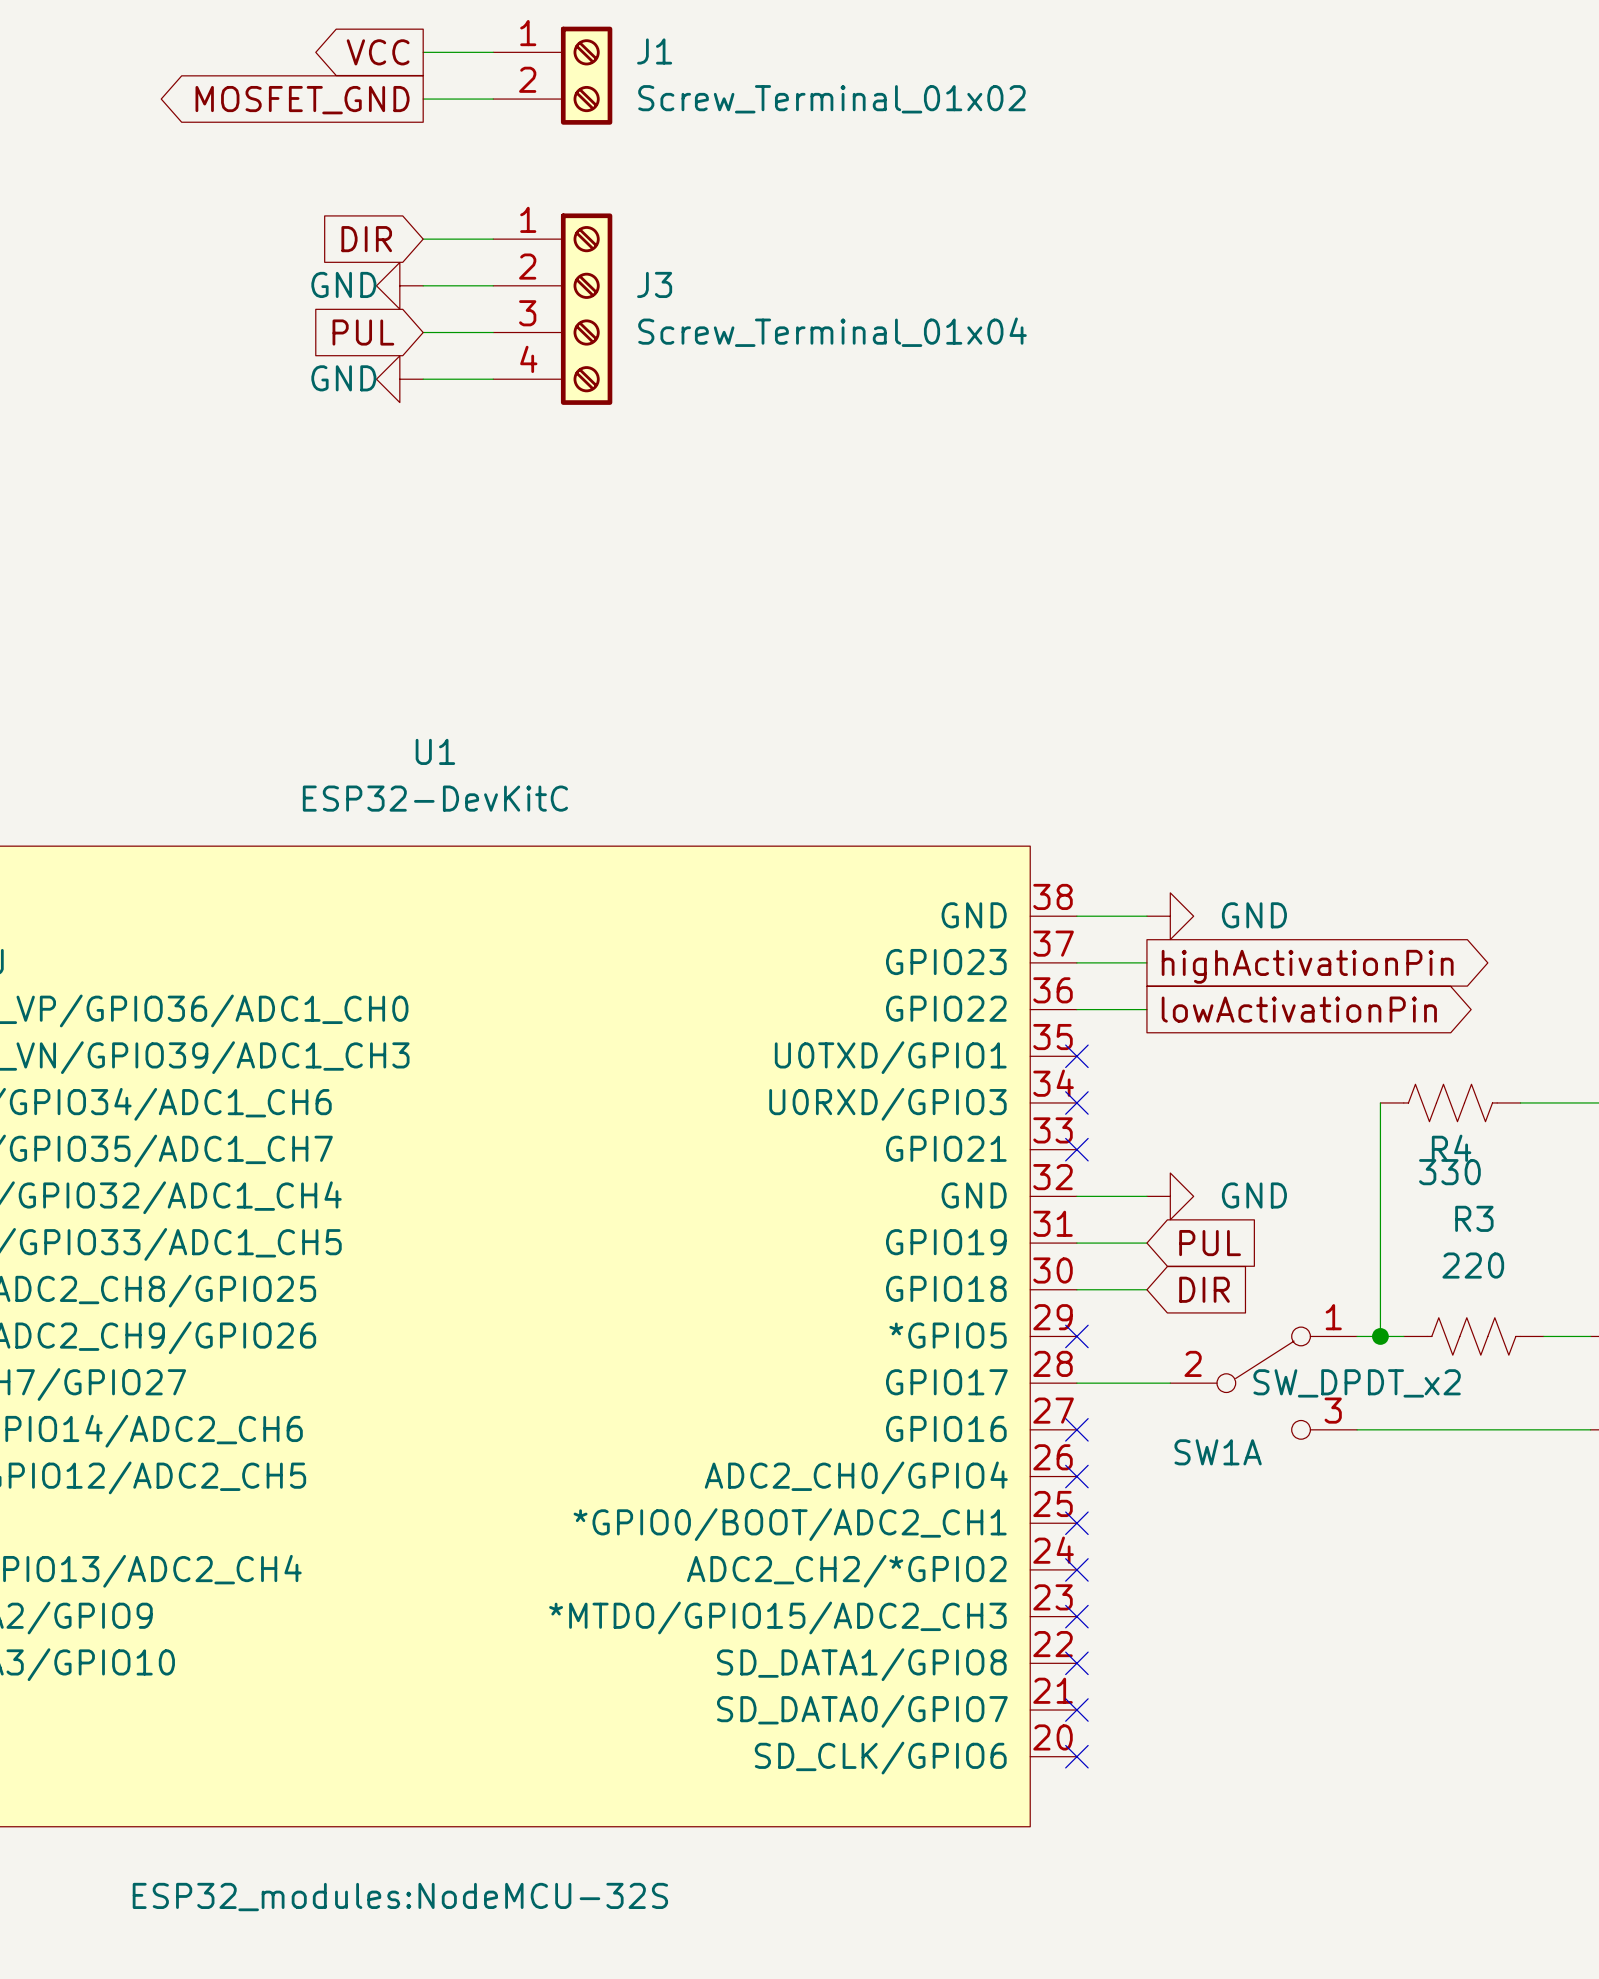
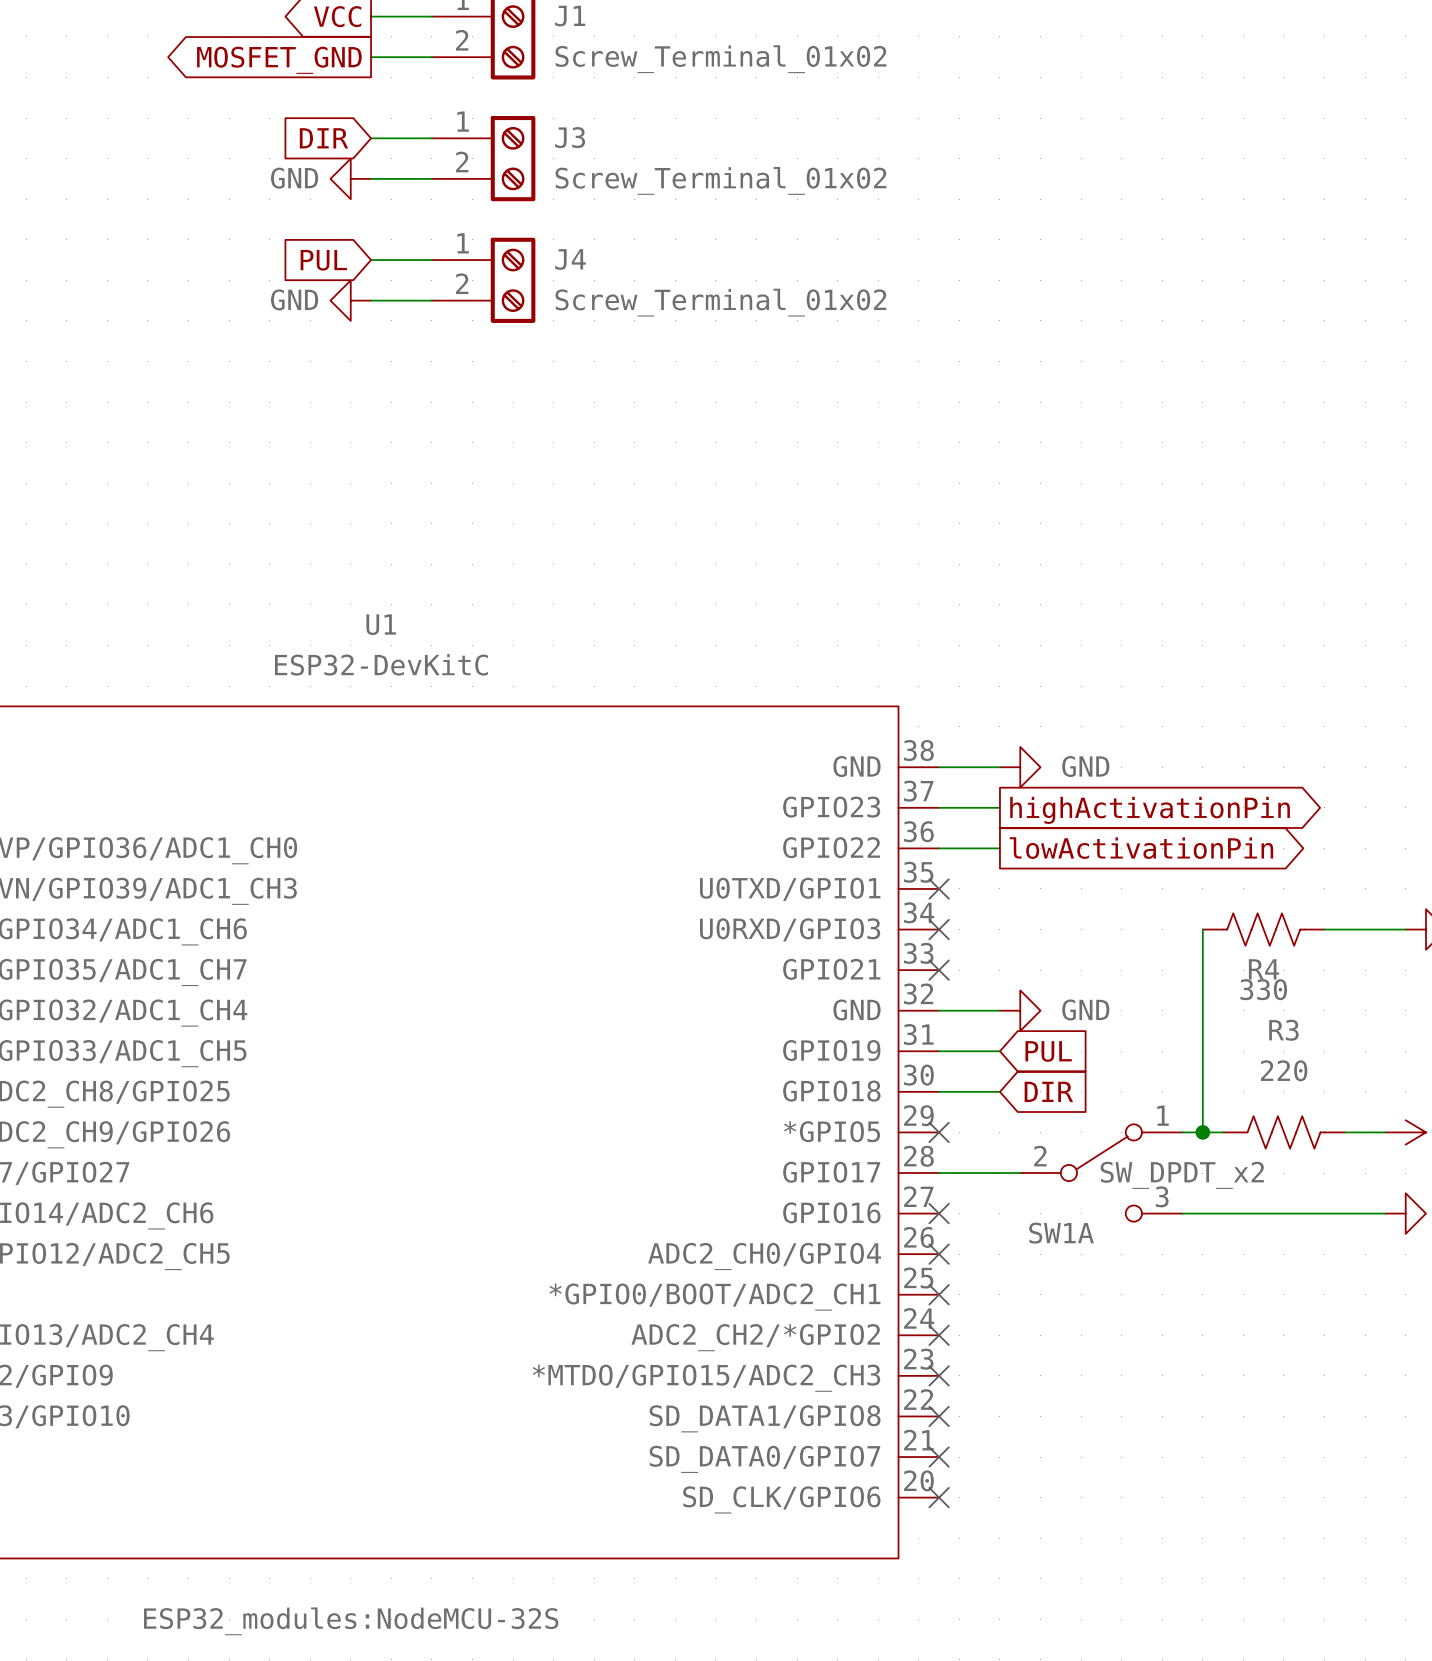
J3 symbol: [493, 213, 613, 405] -> [431, 116, 536, 202]
global label position: DIR (366, 239) -> DIR (324, 138)
power symbol position: GND (399, 285) -> GND (350, 178)
wire: (423, 285) (493, 285) -> (371, 138) (431, 138)
J3 value: Screw_Terminal_01x04 (832, 332) -> Screw_Terminal_01x02 (720, 180)
J4: none -> Screw_Terminal_01x02 (483, 280)

